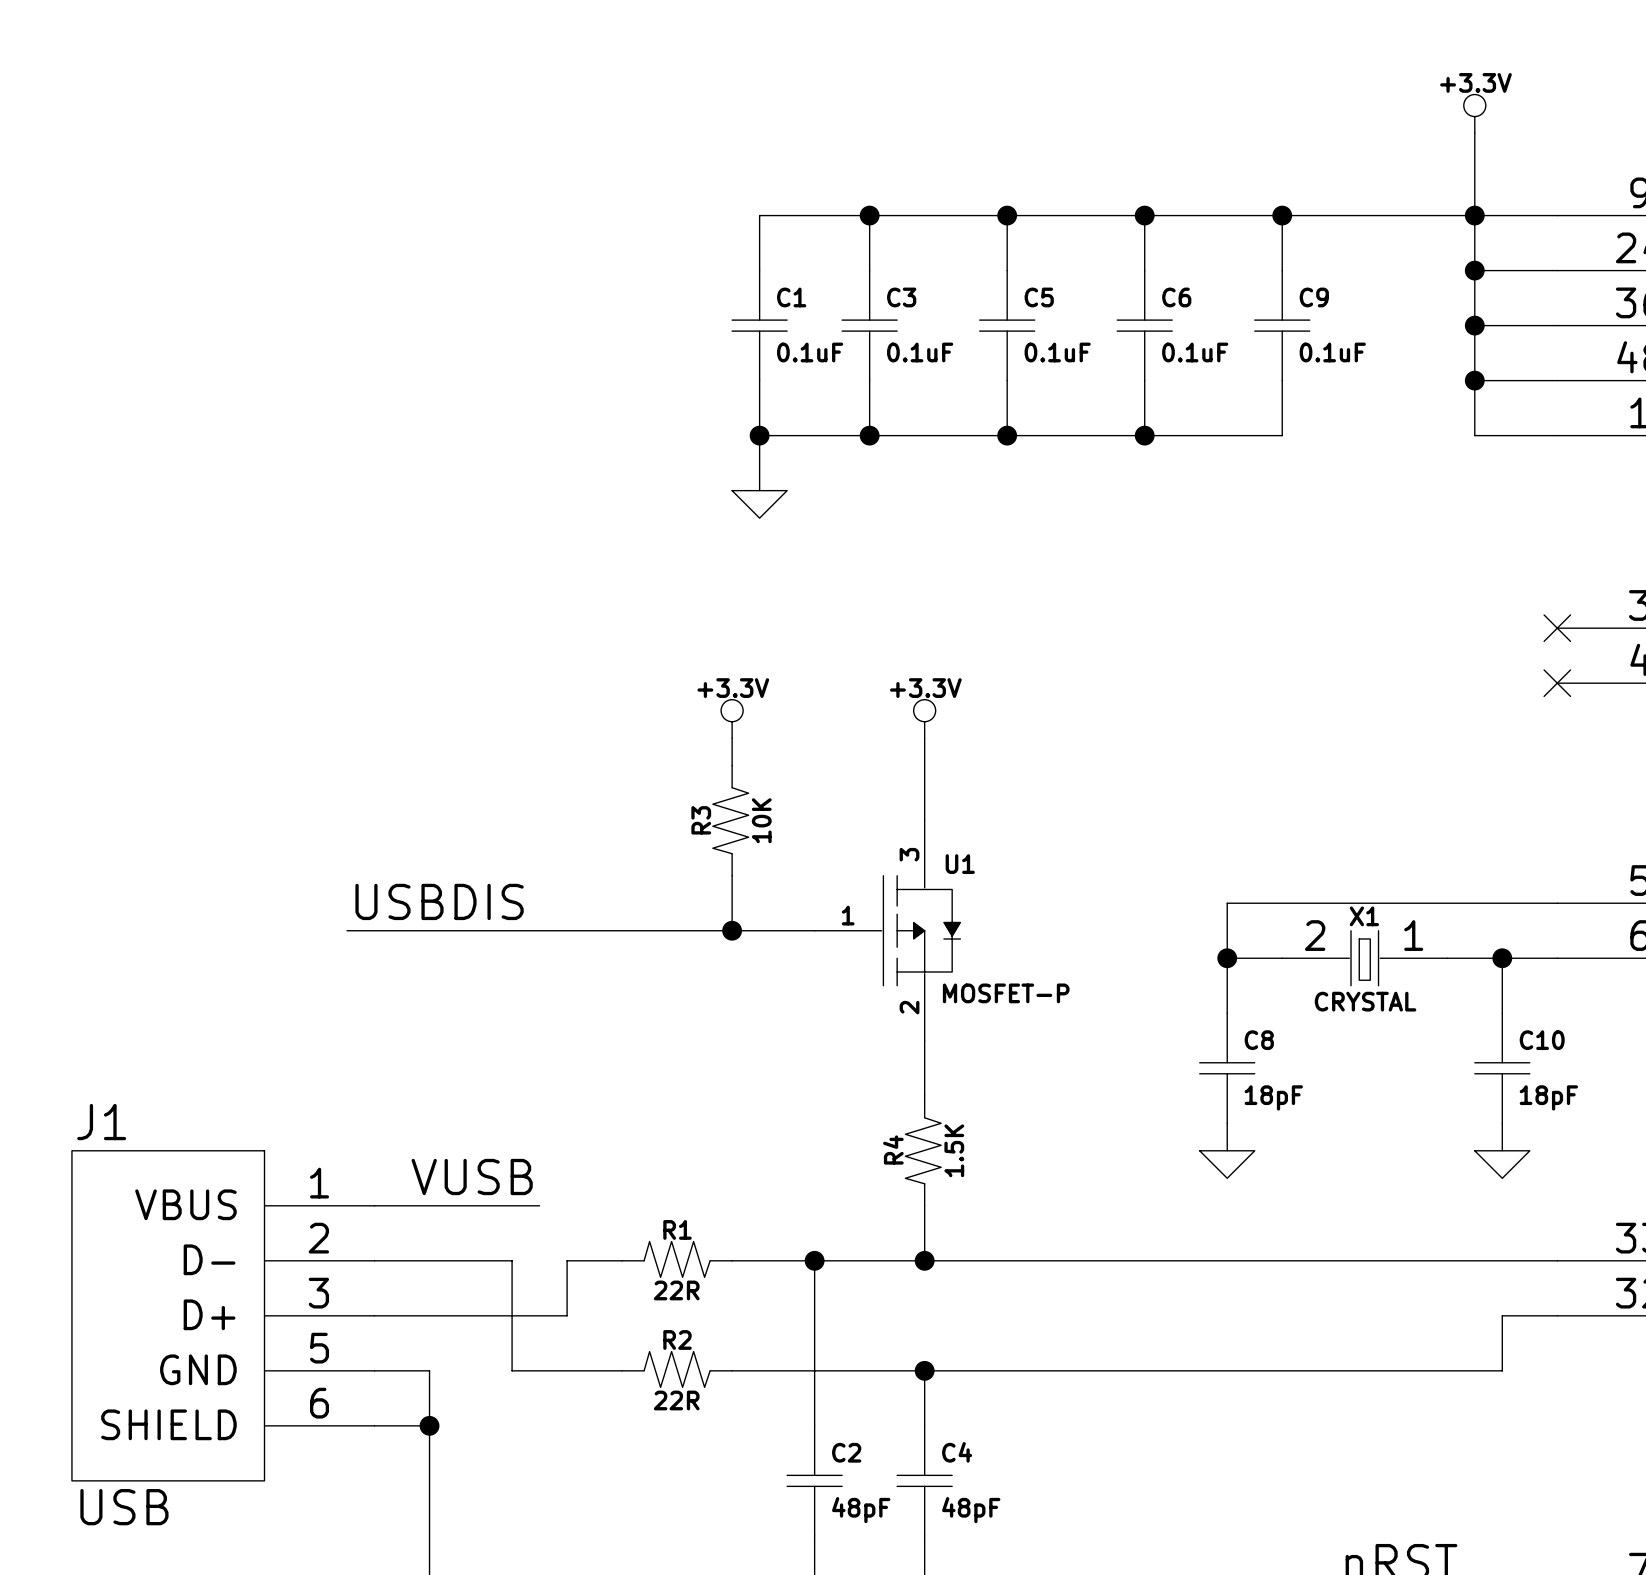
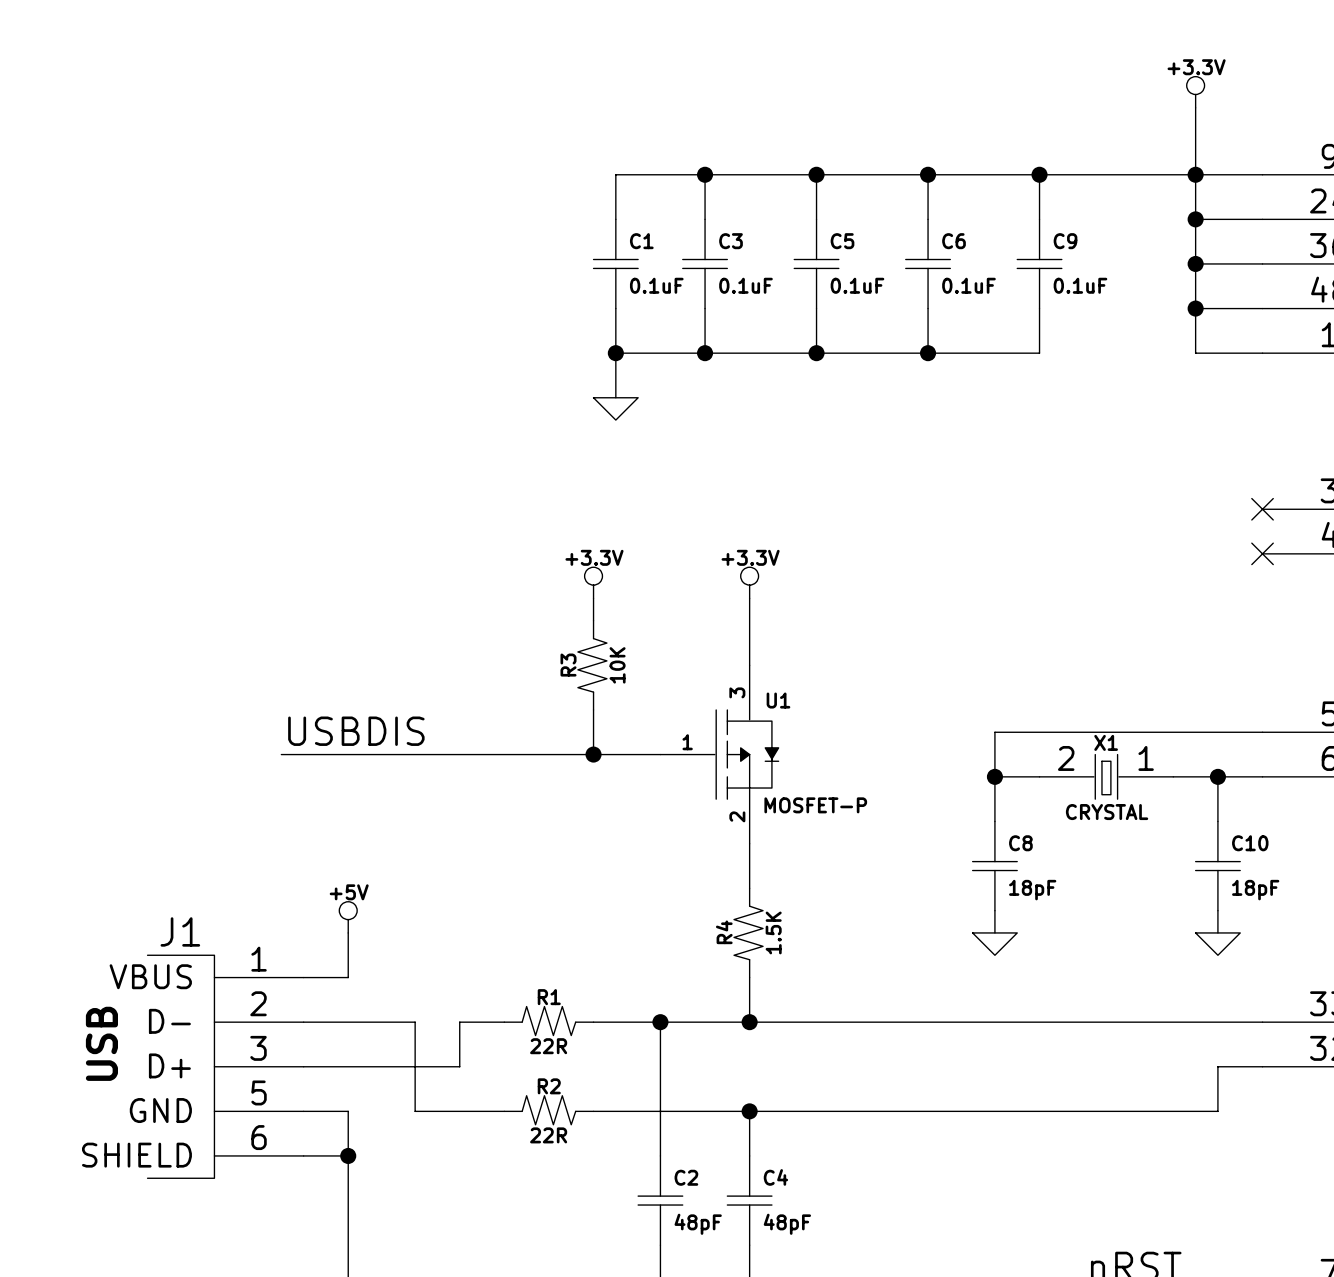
J1 name position: J1 (101, 1122) -> J1 (180, 931)
power symbol: none -> +5V (348, 917)
J1 symbol: [71, 1150, 375, 1481] -> [147, 955, 304, 1179]
label: VUSB (472, 1177) -> none
wire: (429, 1205) (539, 1205) -> (348, 977) (348, 932)
J1 value: USB (124, 1507) -> none

